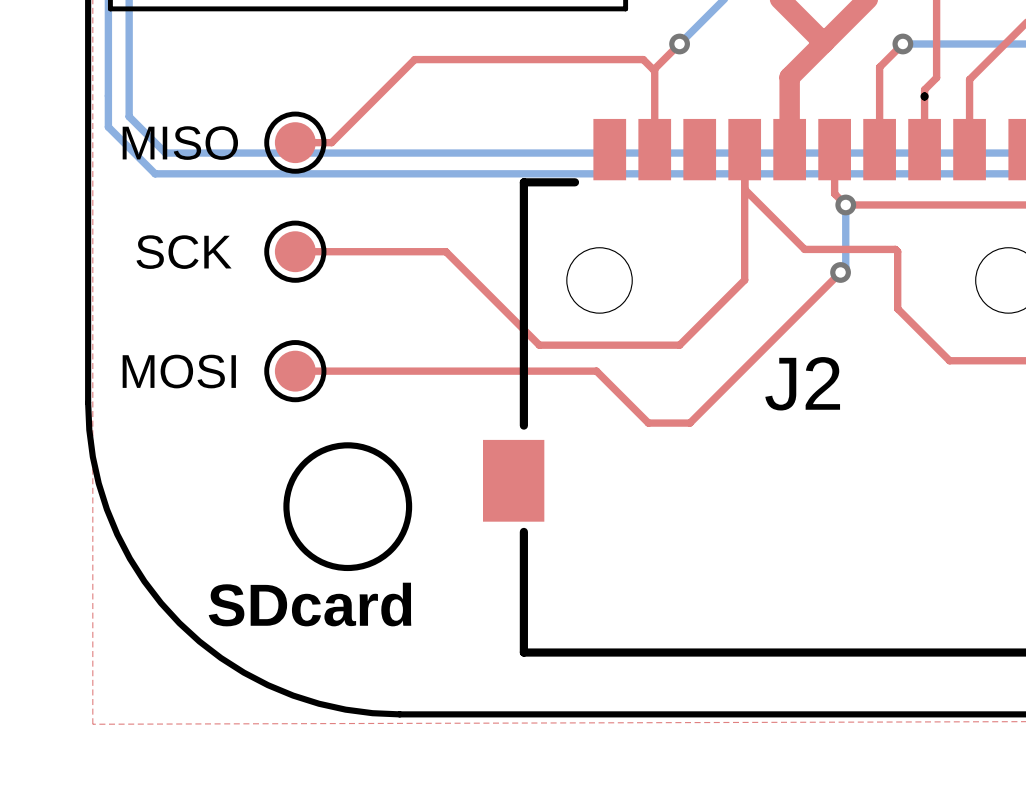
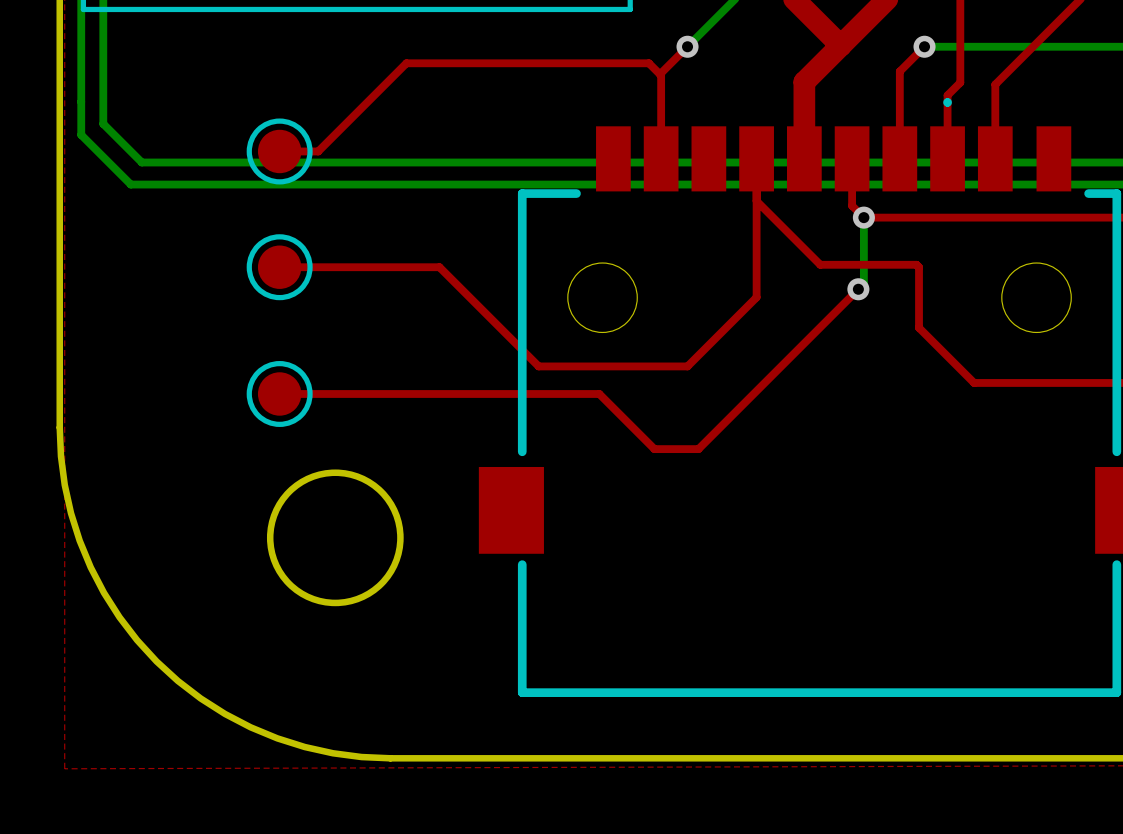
text: MISO (180, 143) -> none
text: SCK (184, 252) -> none
text: MOSI (179, 371) -> none
J2 name: J2 (802, 383) -> none
text: SDcard (310, 604) -> none

